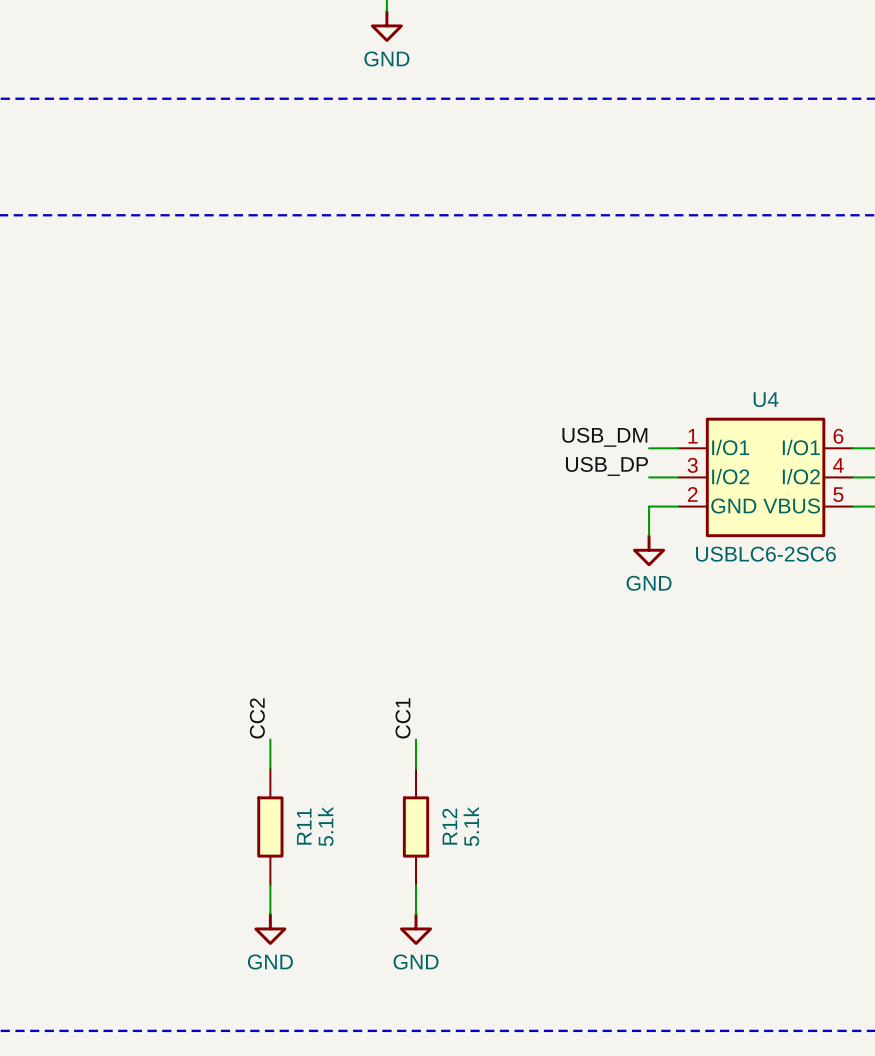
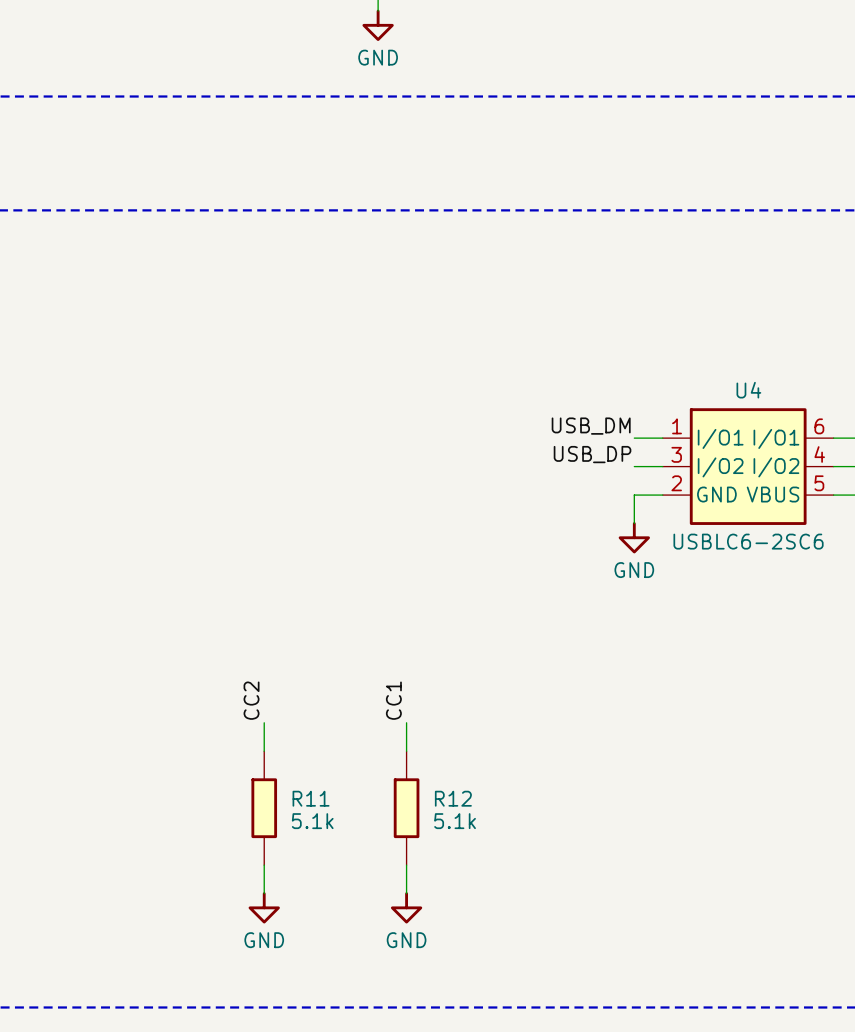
R11 name rotation: 0° (304, 826) -> 90° clockwise (311, 798)
R11 value rotation: 0° (325, 826) -> 90° clockwise (312, 821)
R12 name rotation: 0° (449, 826) -> 90° clockwise (453, 798)
R12 value rotation: 0° (471, 826) -> 90° clockwise (455, 821)

